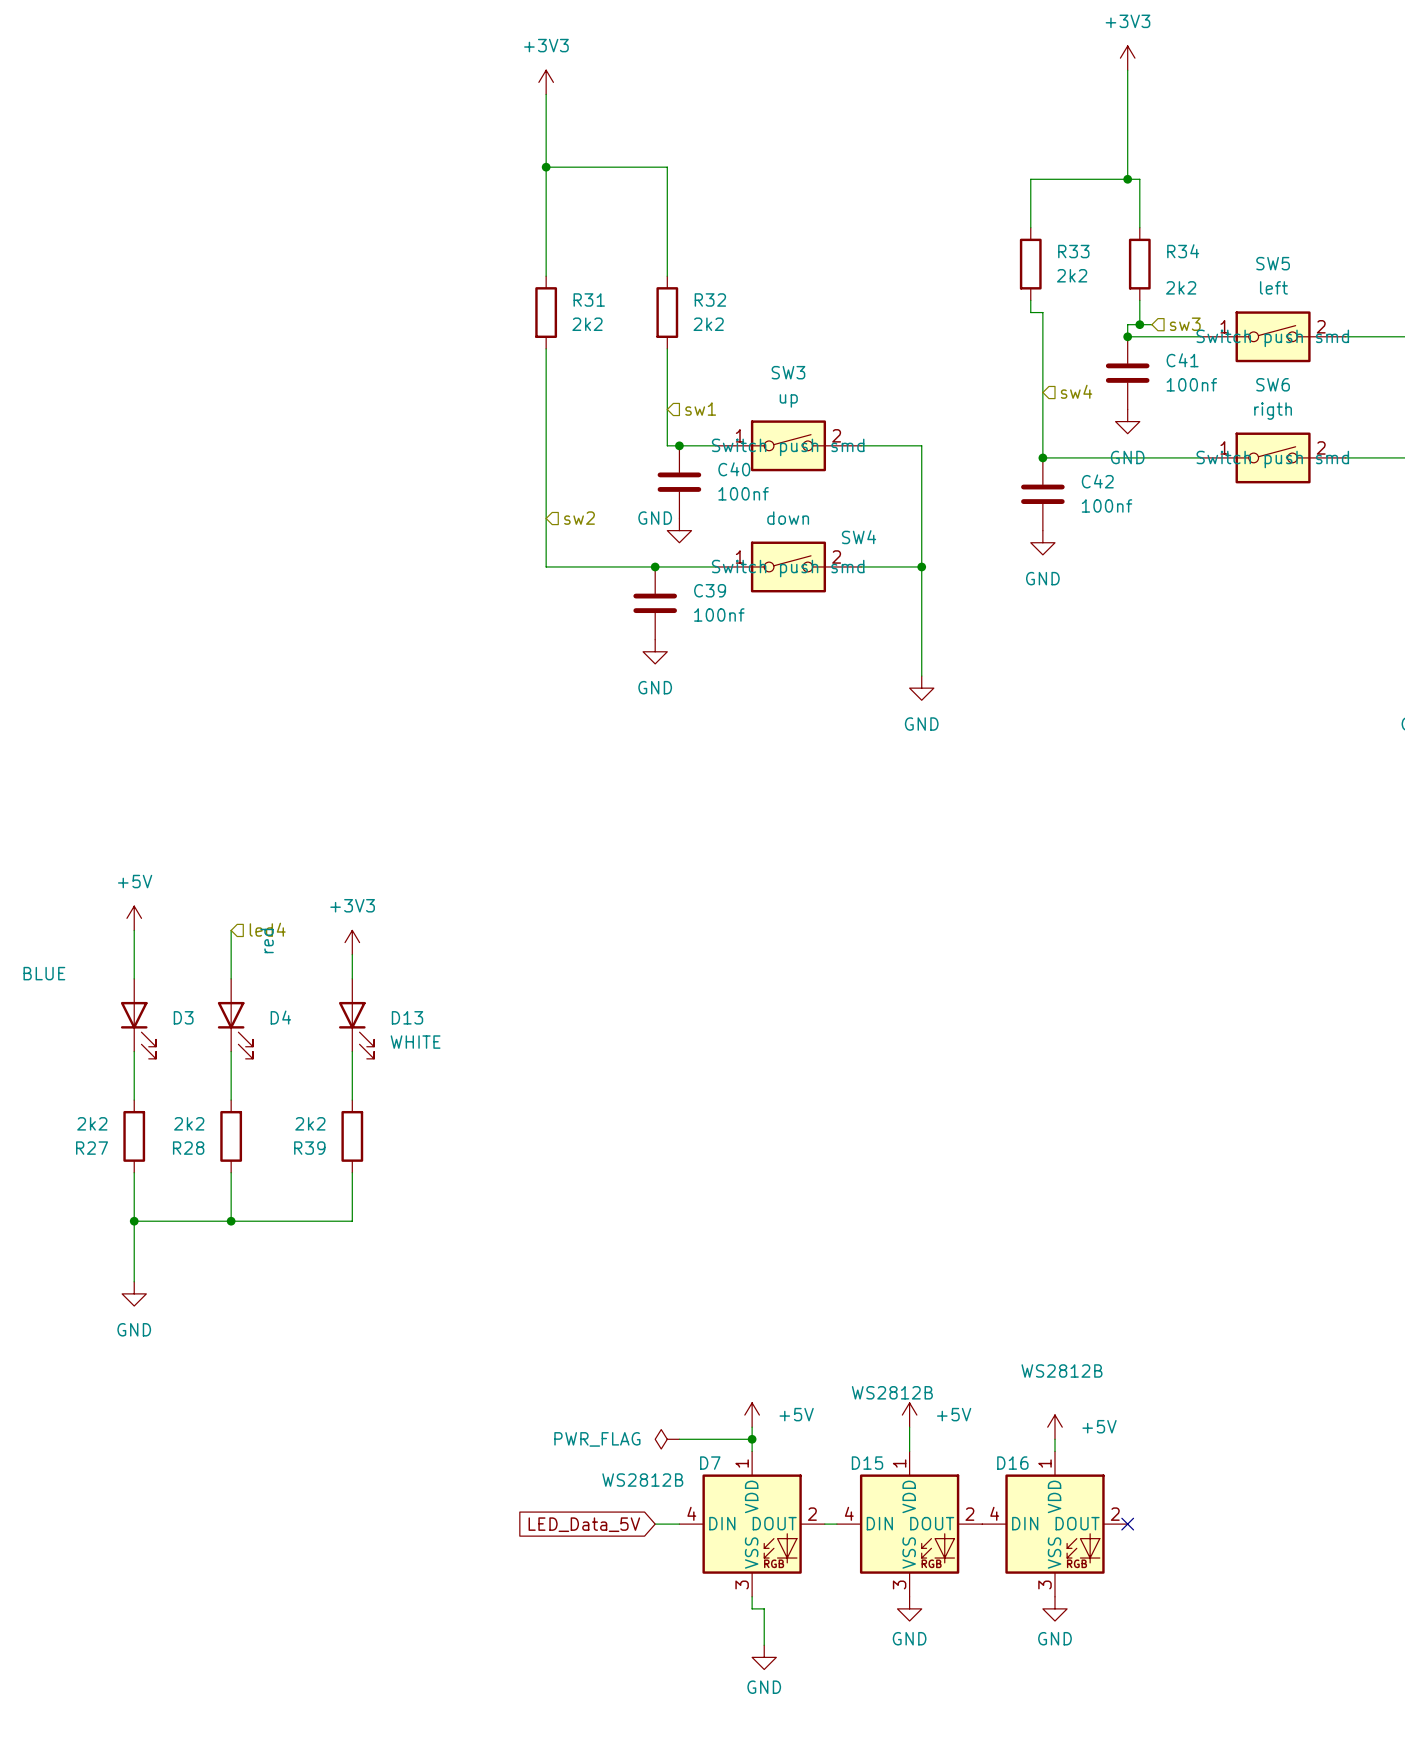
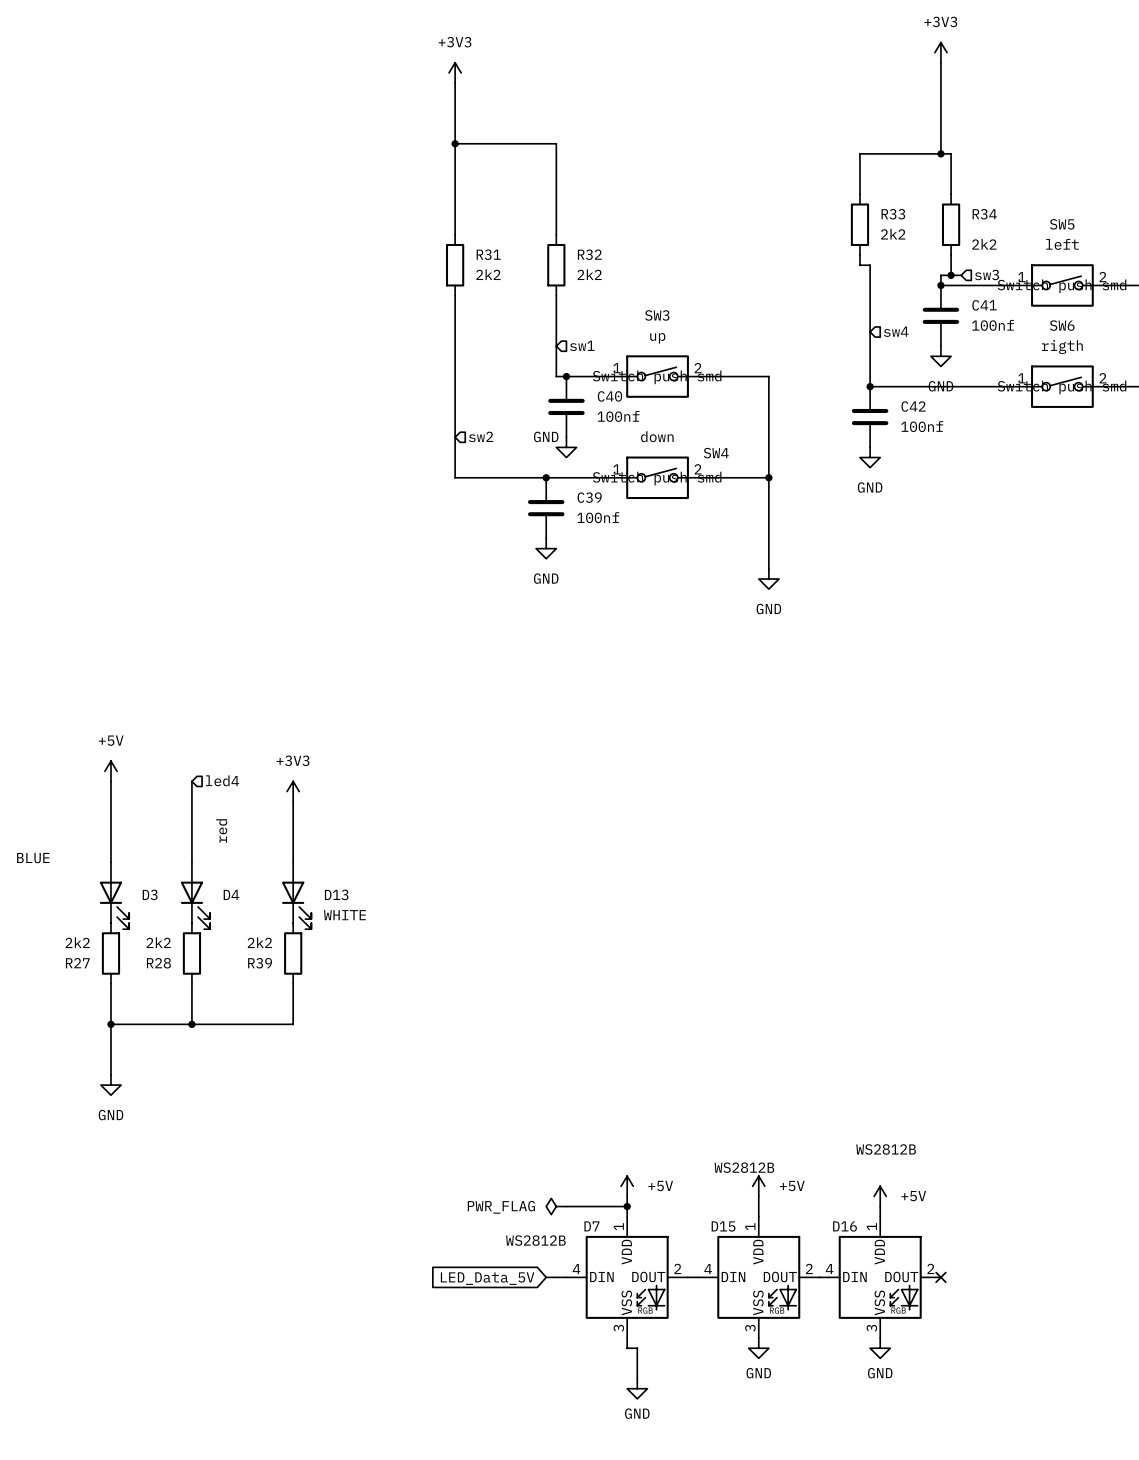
D3 position: (138, 1018) -> (114, 895)
D4 position: (235, 1018) -> (195, 895)
D13 position: (356, 1018) -> (296, 895)

